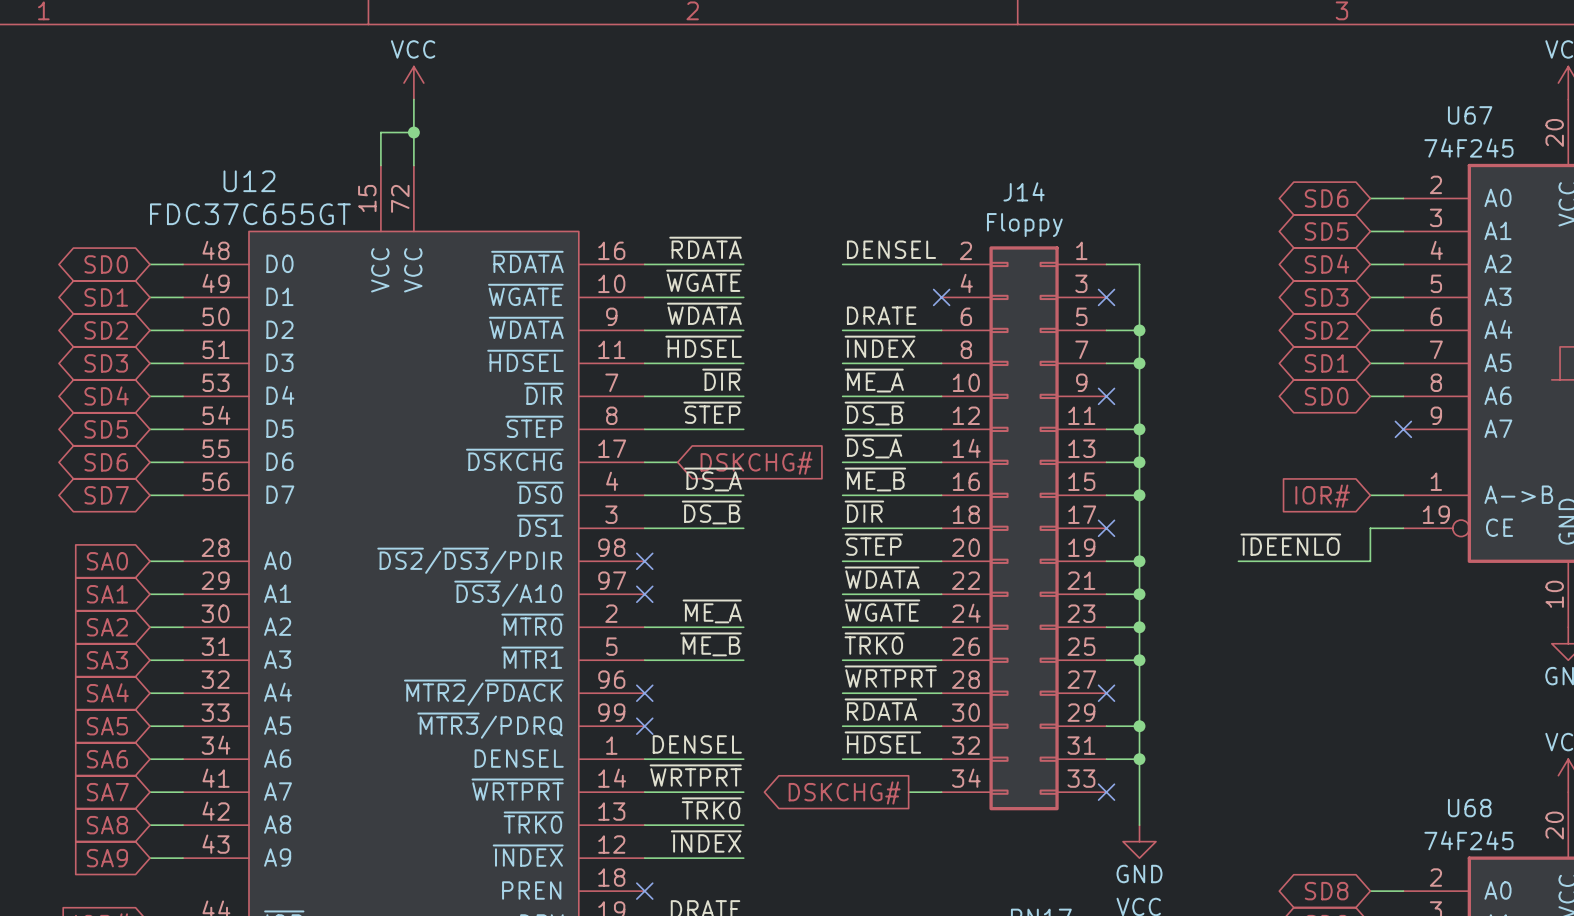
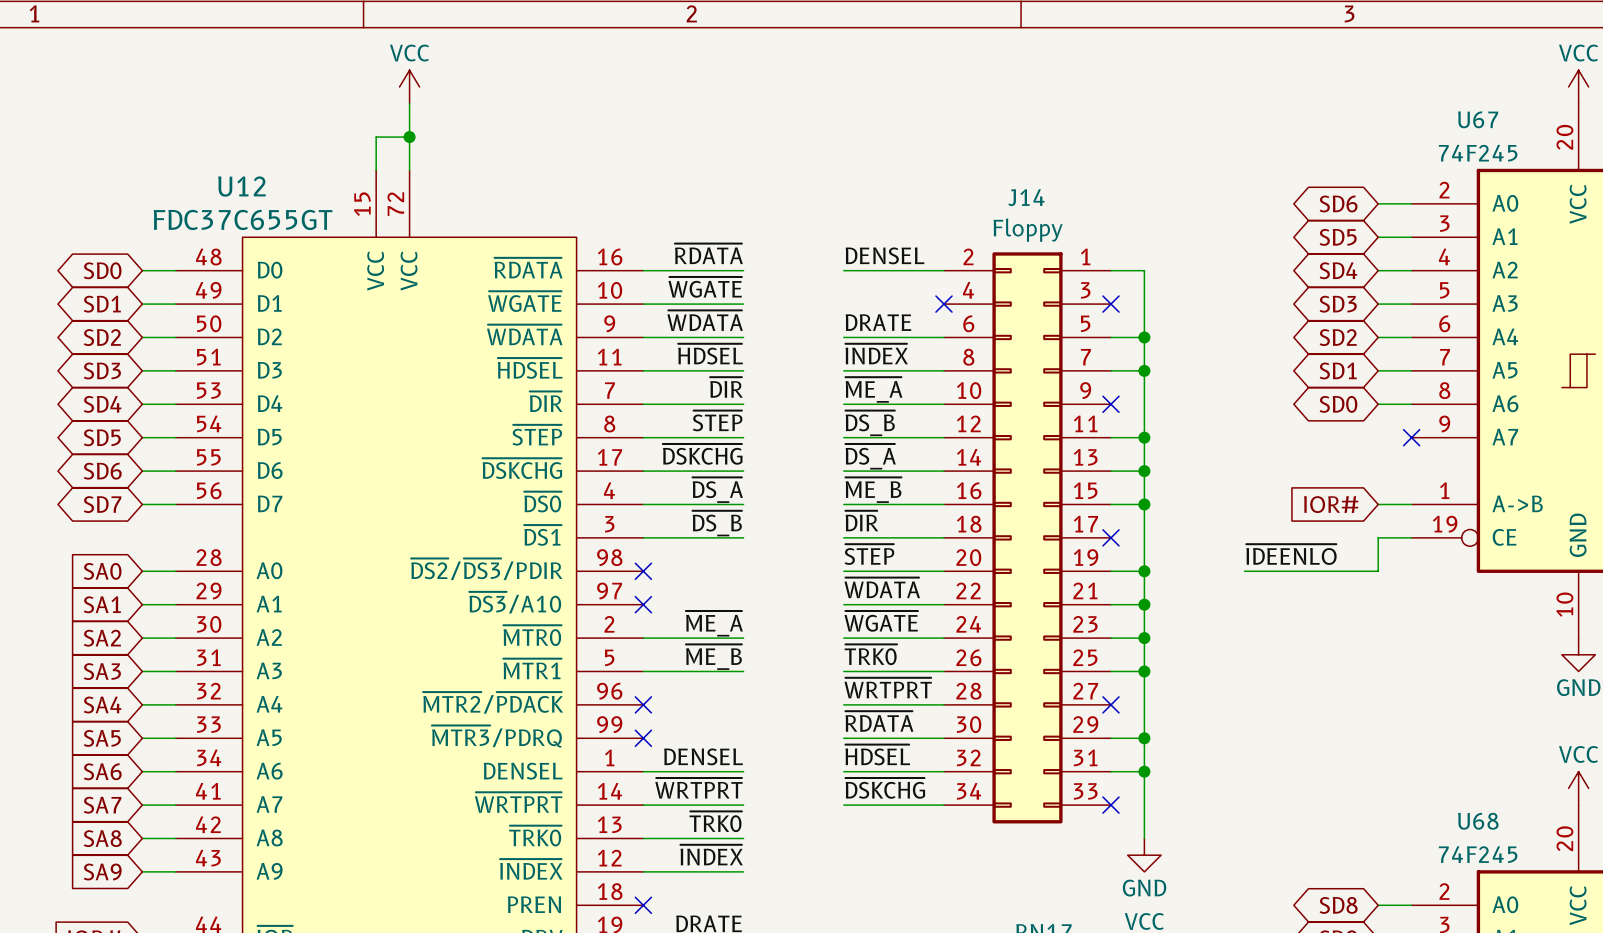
label: none -> ~{DSKCHG} (702, 454)
wire: none -> (676, 471) (743, 471)
global label: DSKCHG# (756, 463) -> none
label: none -> ~{DSKCHG} (885, 788)
wire: none -> (843, 805) (910, 805)
global label: DSKCHG# (844, 792) -> none

